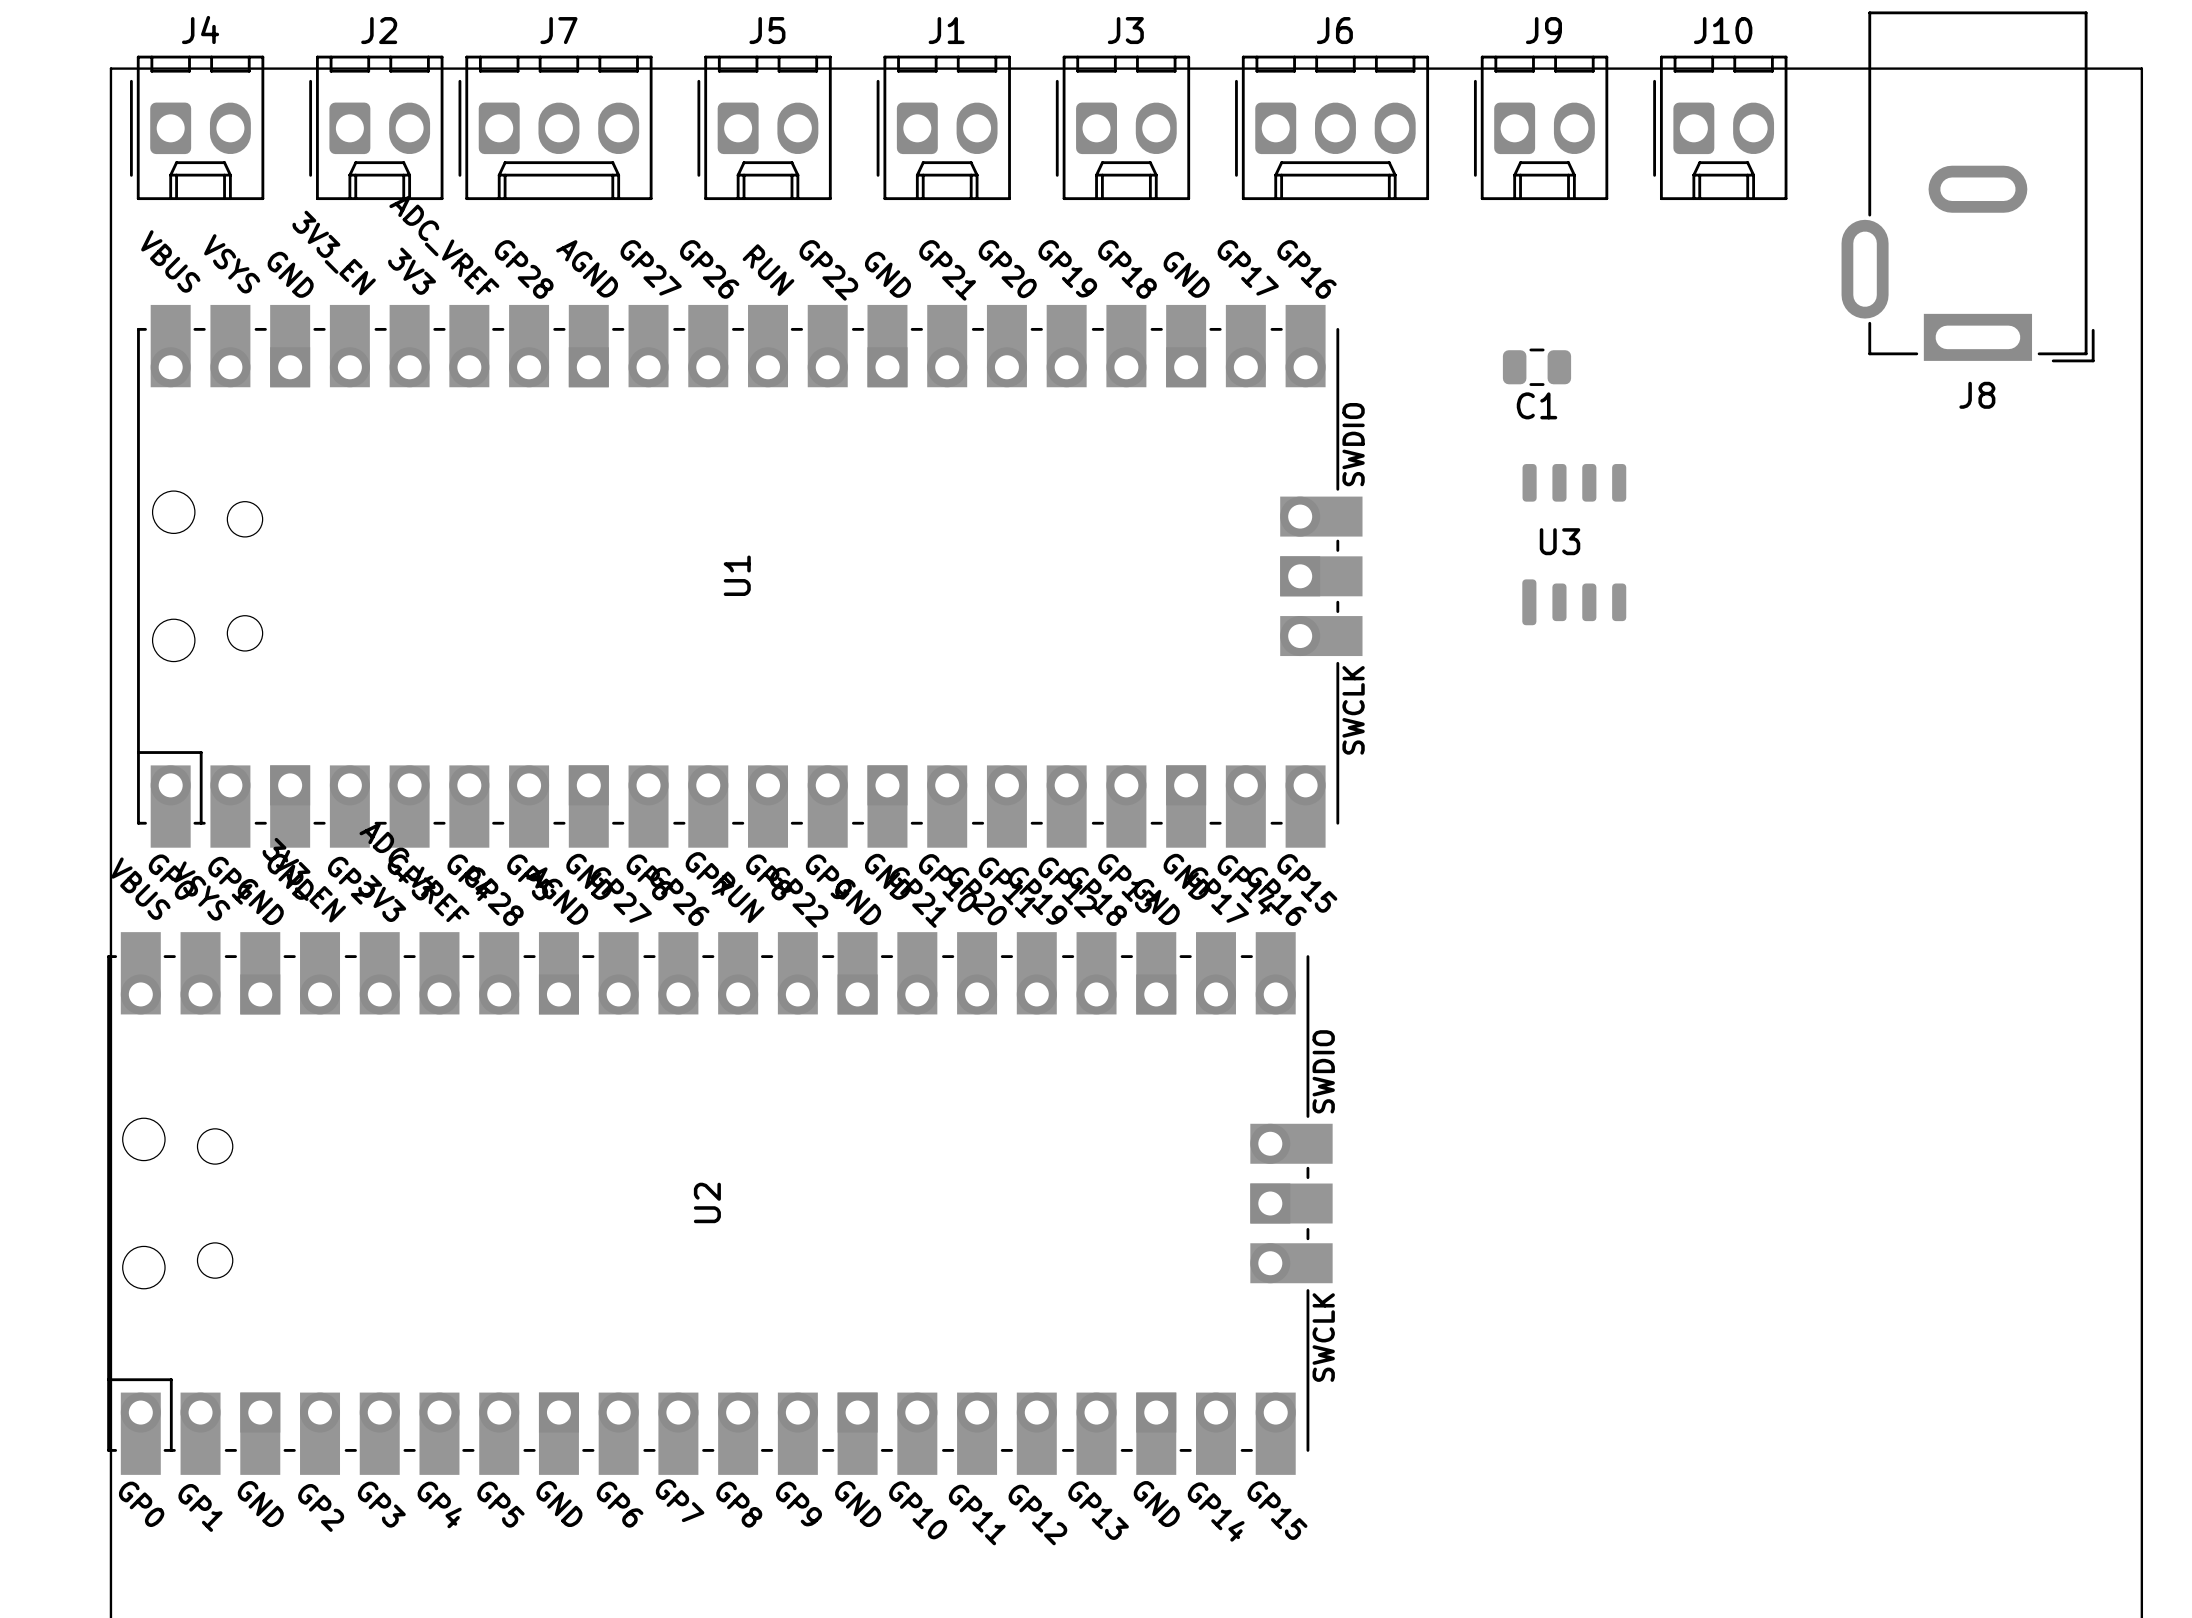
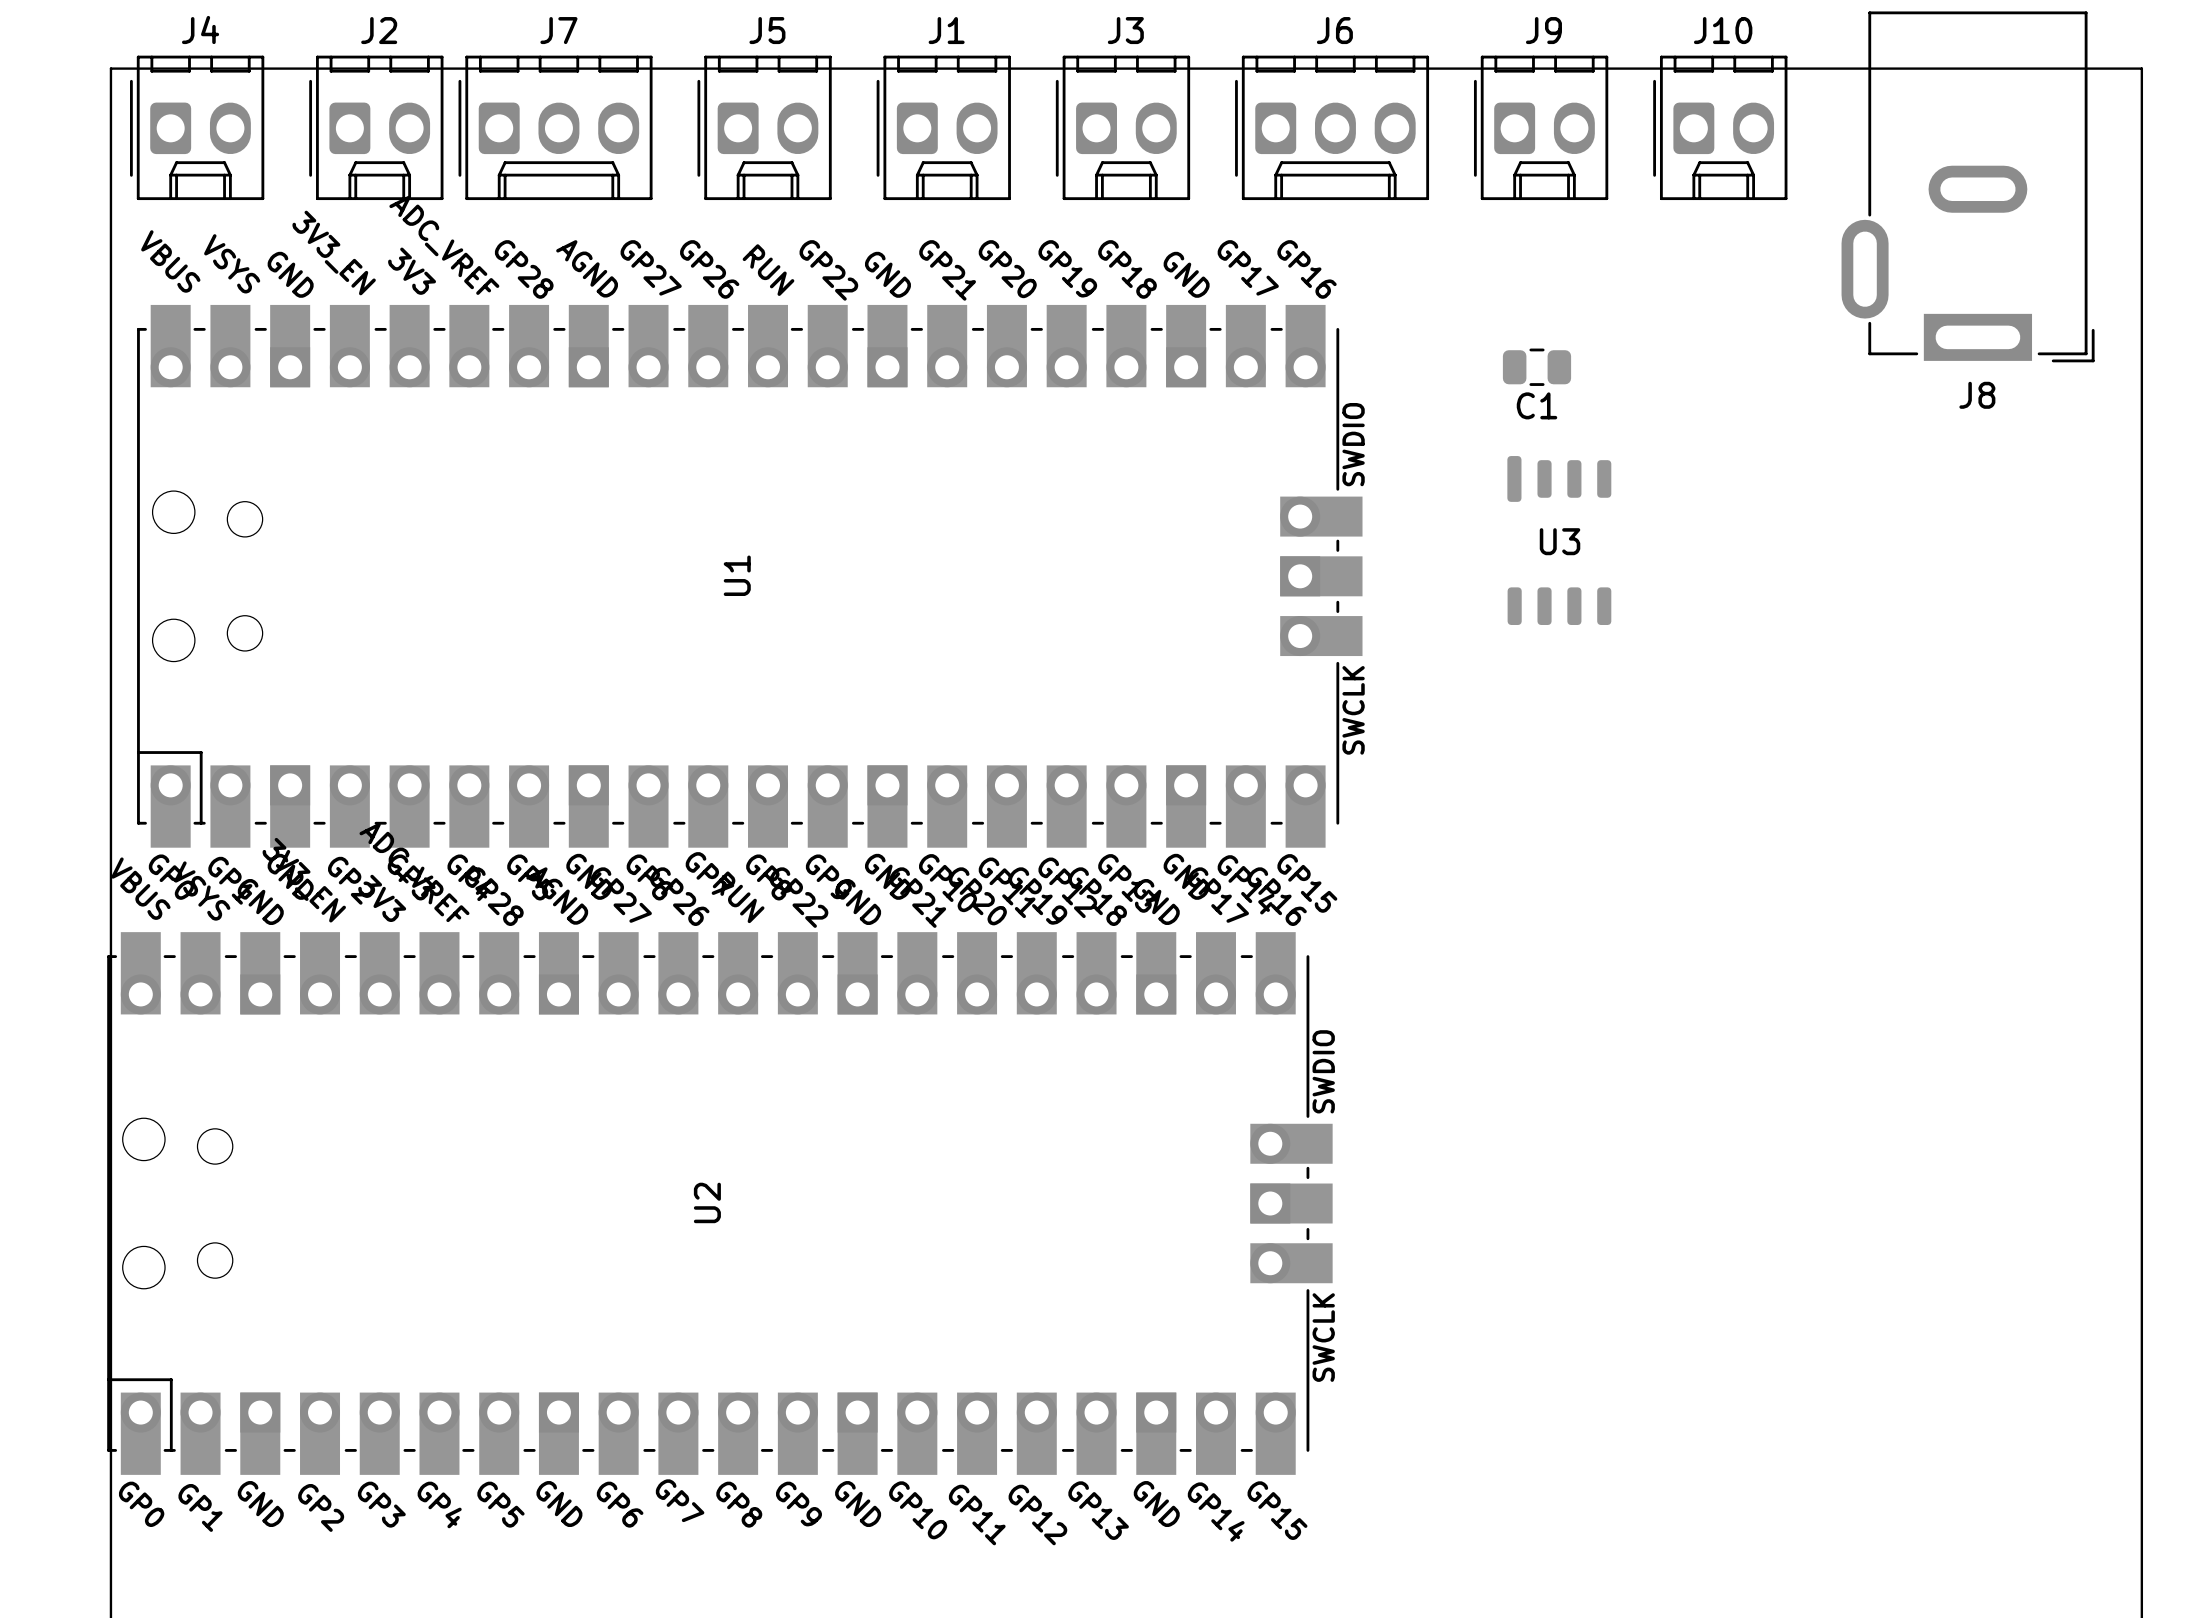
U3 footprint: [1522, 464, 1627, 626] -> [1507, 456, 1612, 625]

